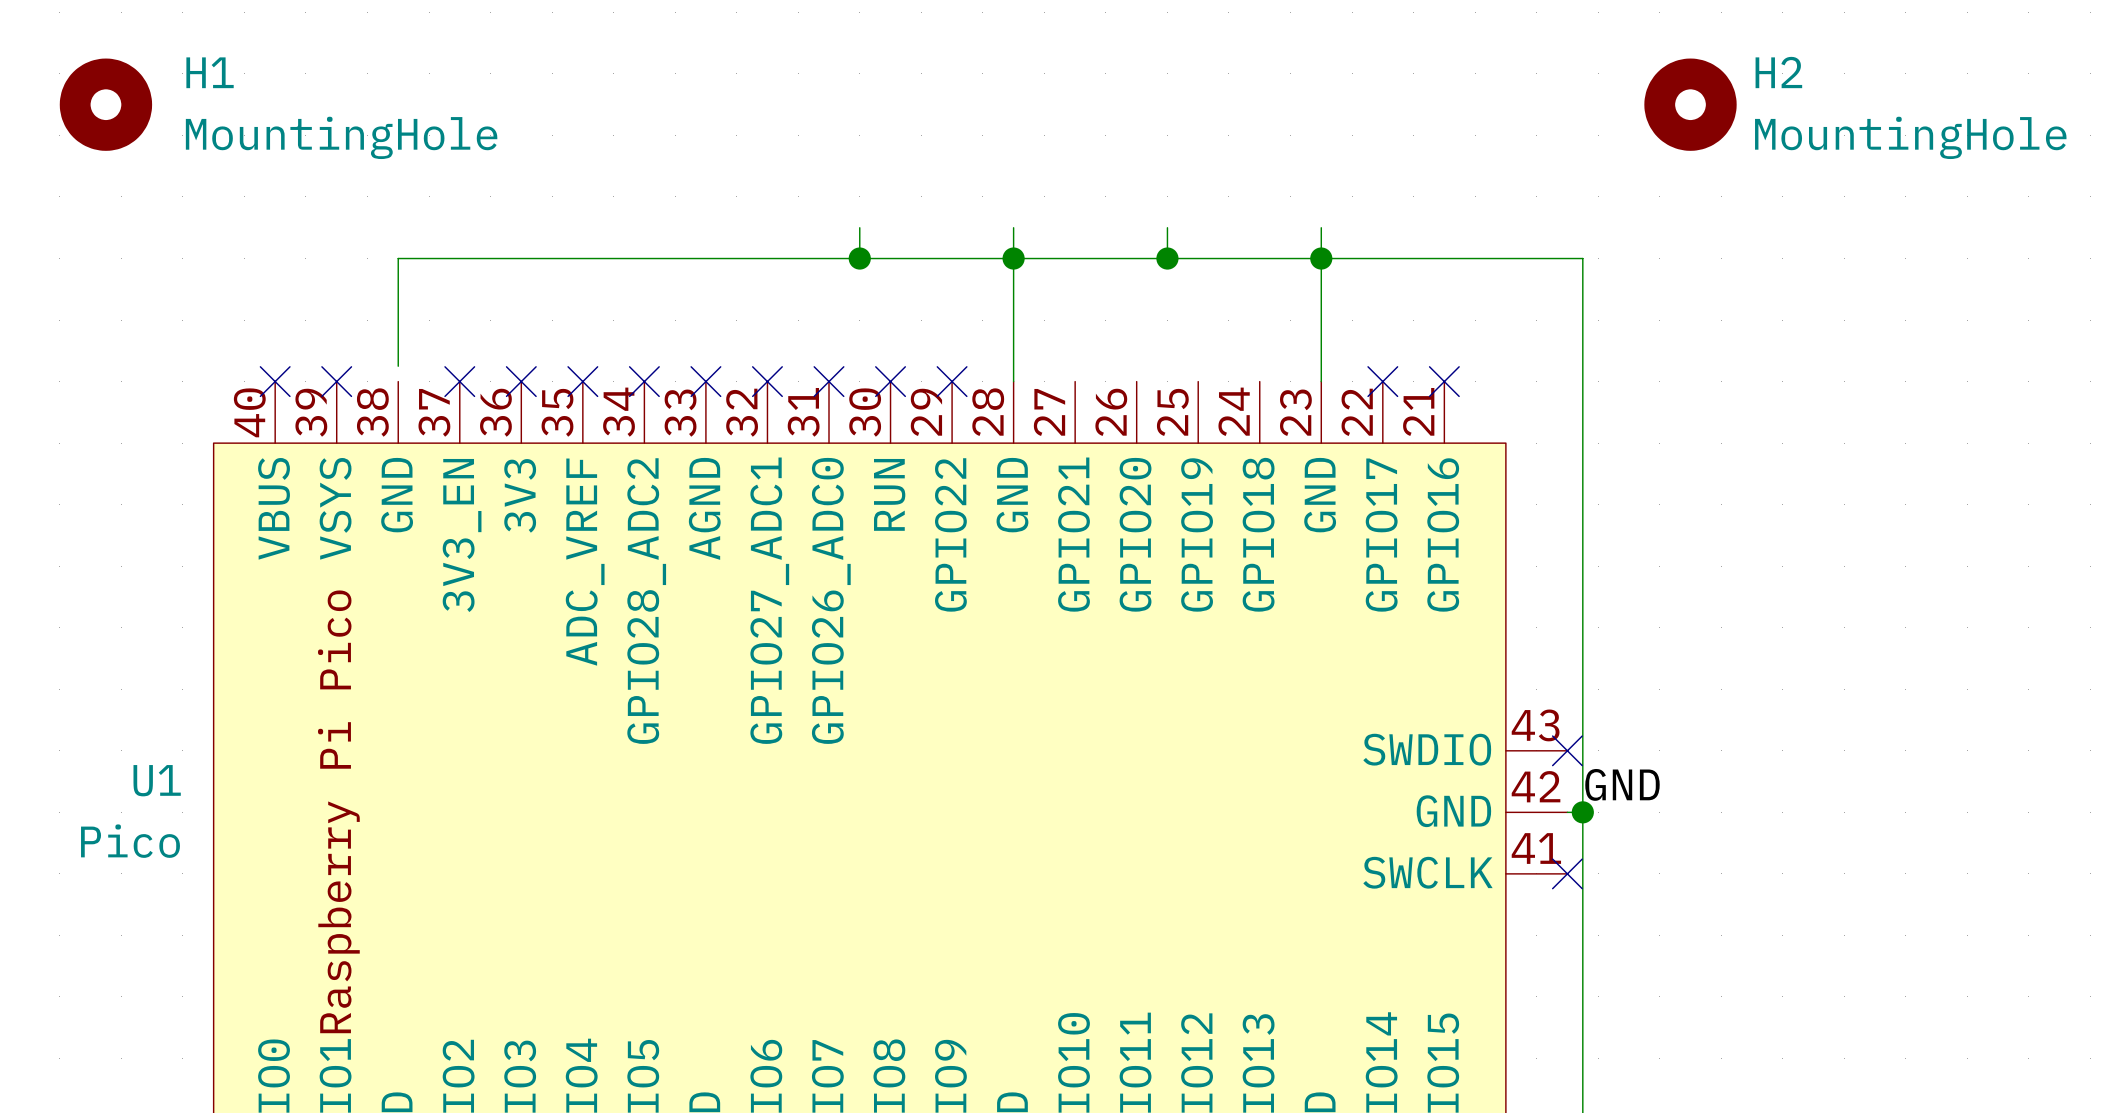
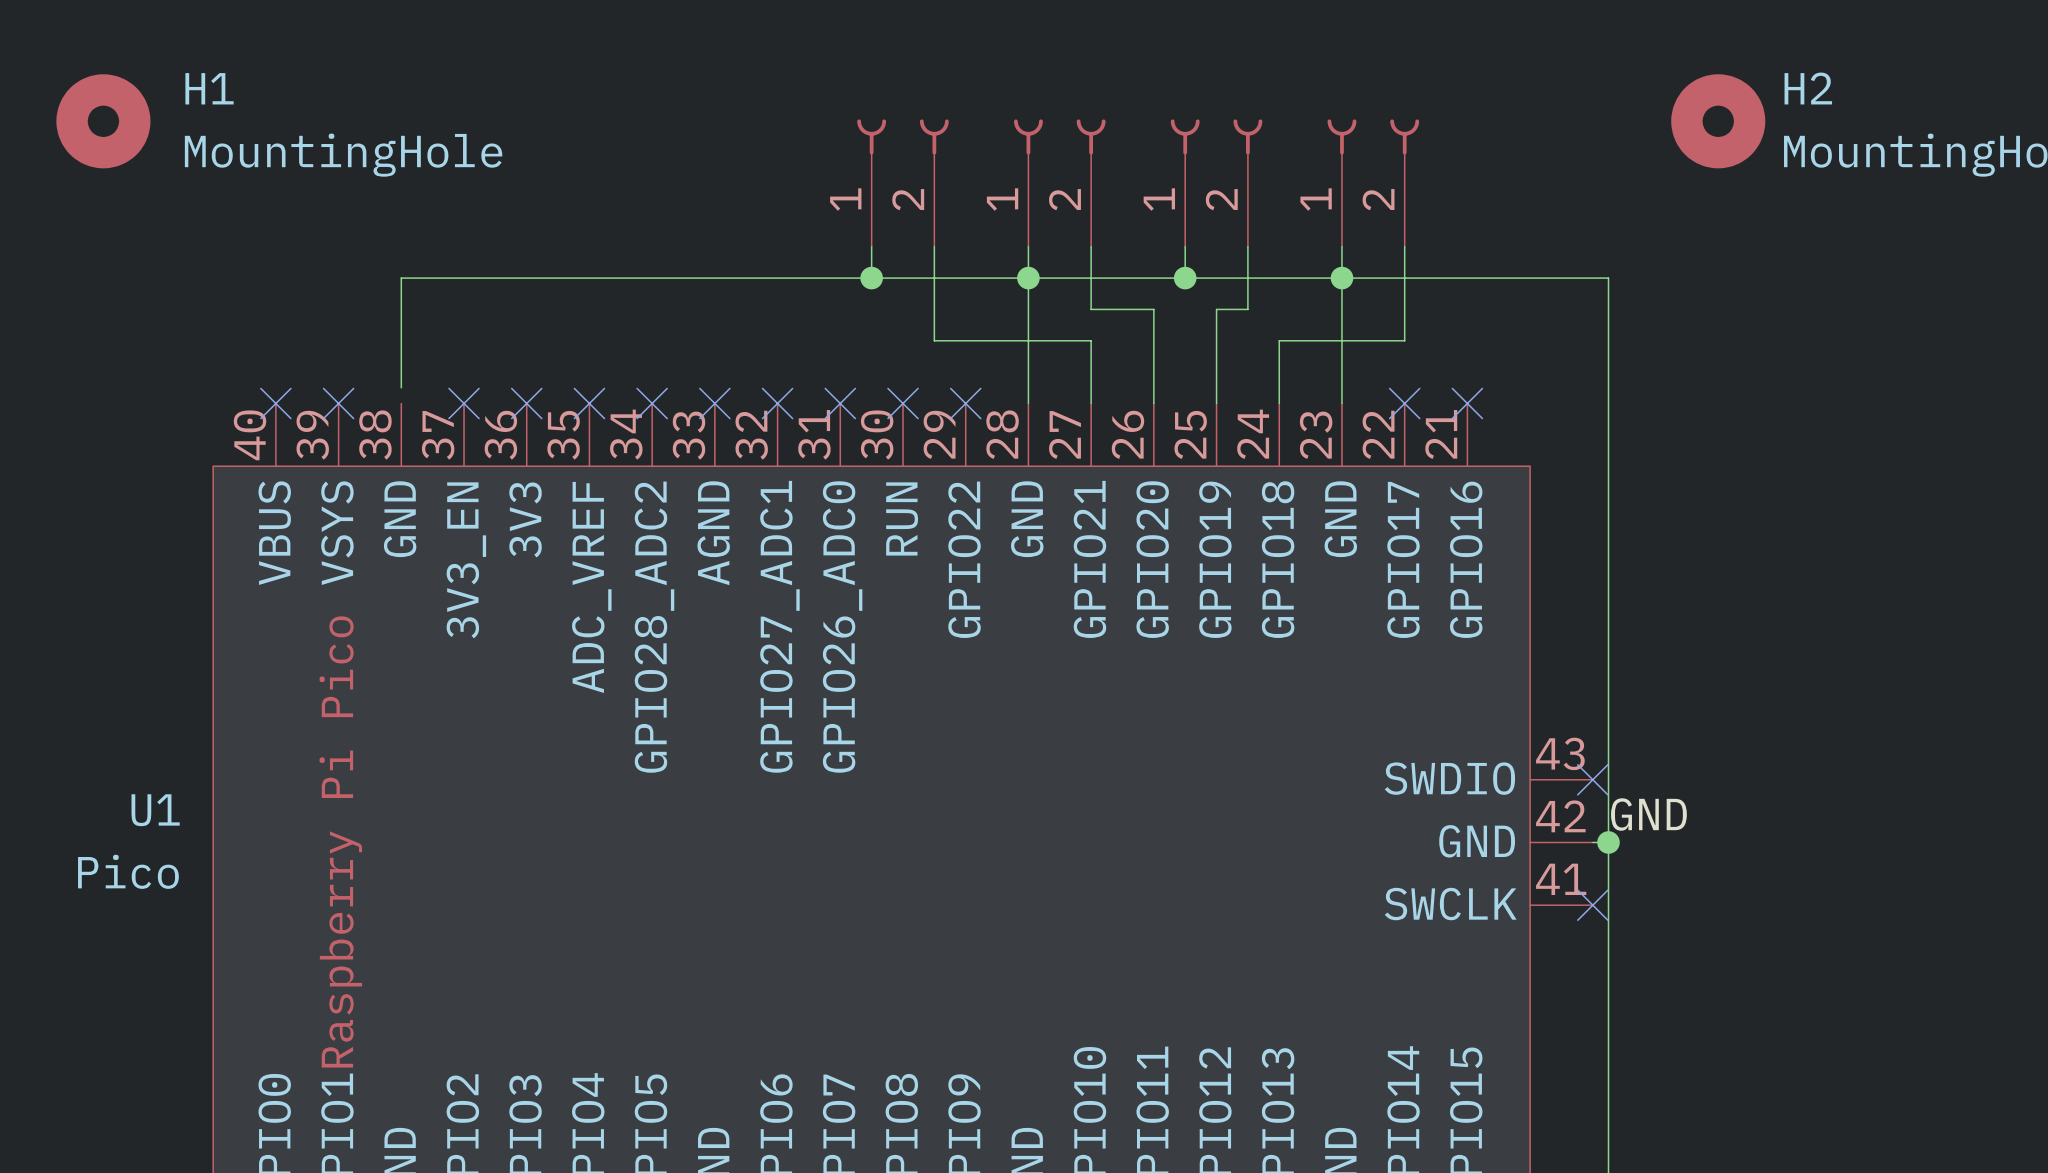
part: none -> (903, 183)
part: none -> (1059, 183)
part: none -> (1216, 183)
part: none -> (1373, 183)
wire: none -> (934, 246) (934, 340) (1091, 340) (1091, 403)
wire: none -> (1091, 246) (1091, 309) (1153, 309) (1153, 403)
wire: none -> (1247, 246) (1247, 309) (1216, 309) (1216, 403)
wire: none -> (1404, 246) (1404, 340) (1279, 340) (1279, 403)

